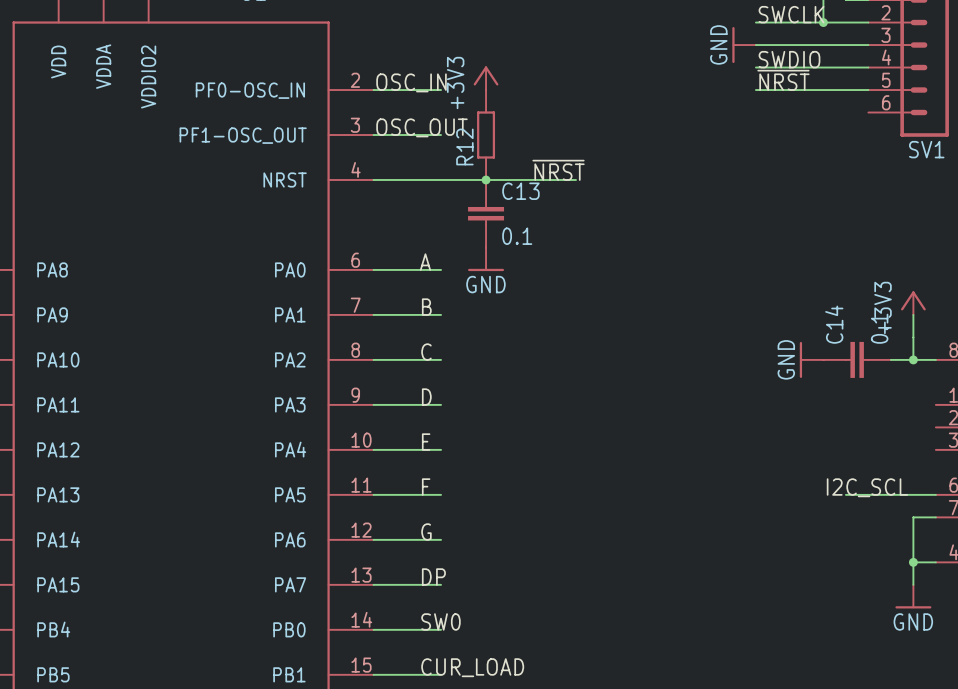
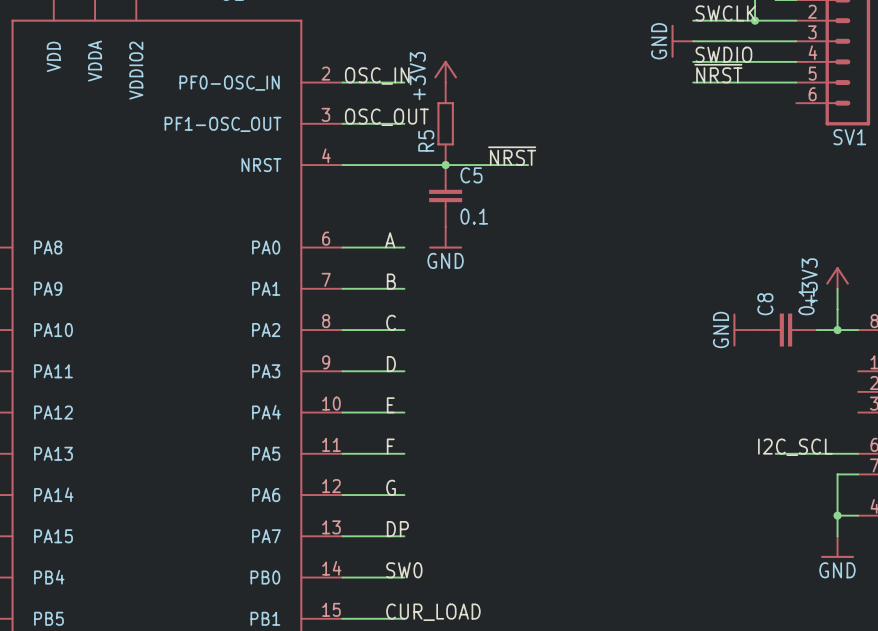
R12 name: R12 (464, 146) -> R5 (426, 140)
C13 name: C13 (520, 191) -> C5 (471, 175)
C14 name: C14 (834, 324) -> C8 (765, 304)

